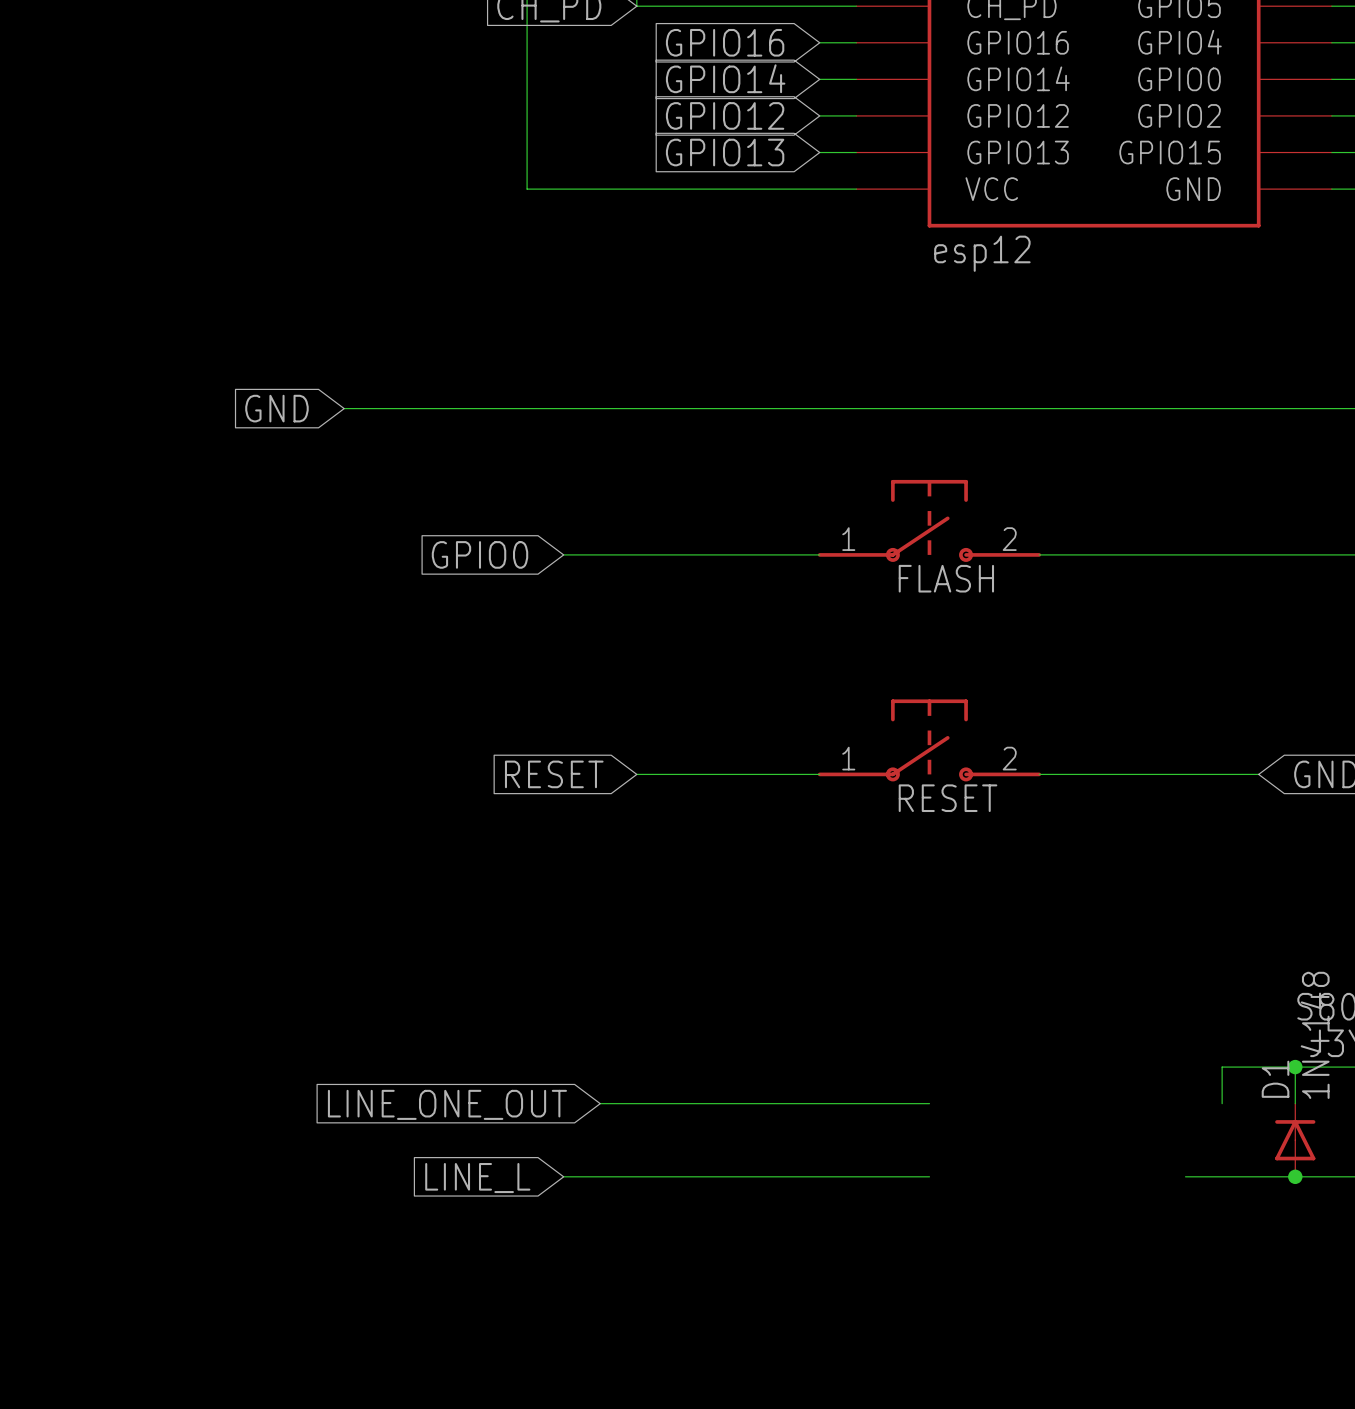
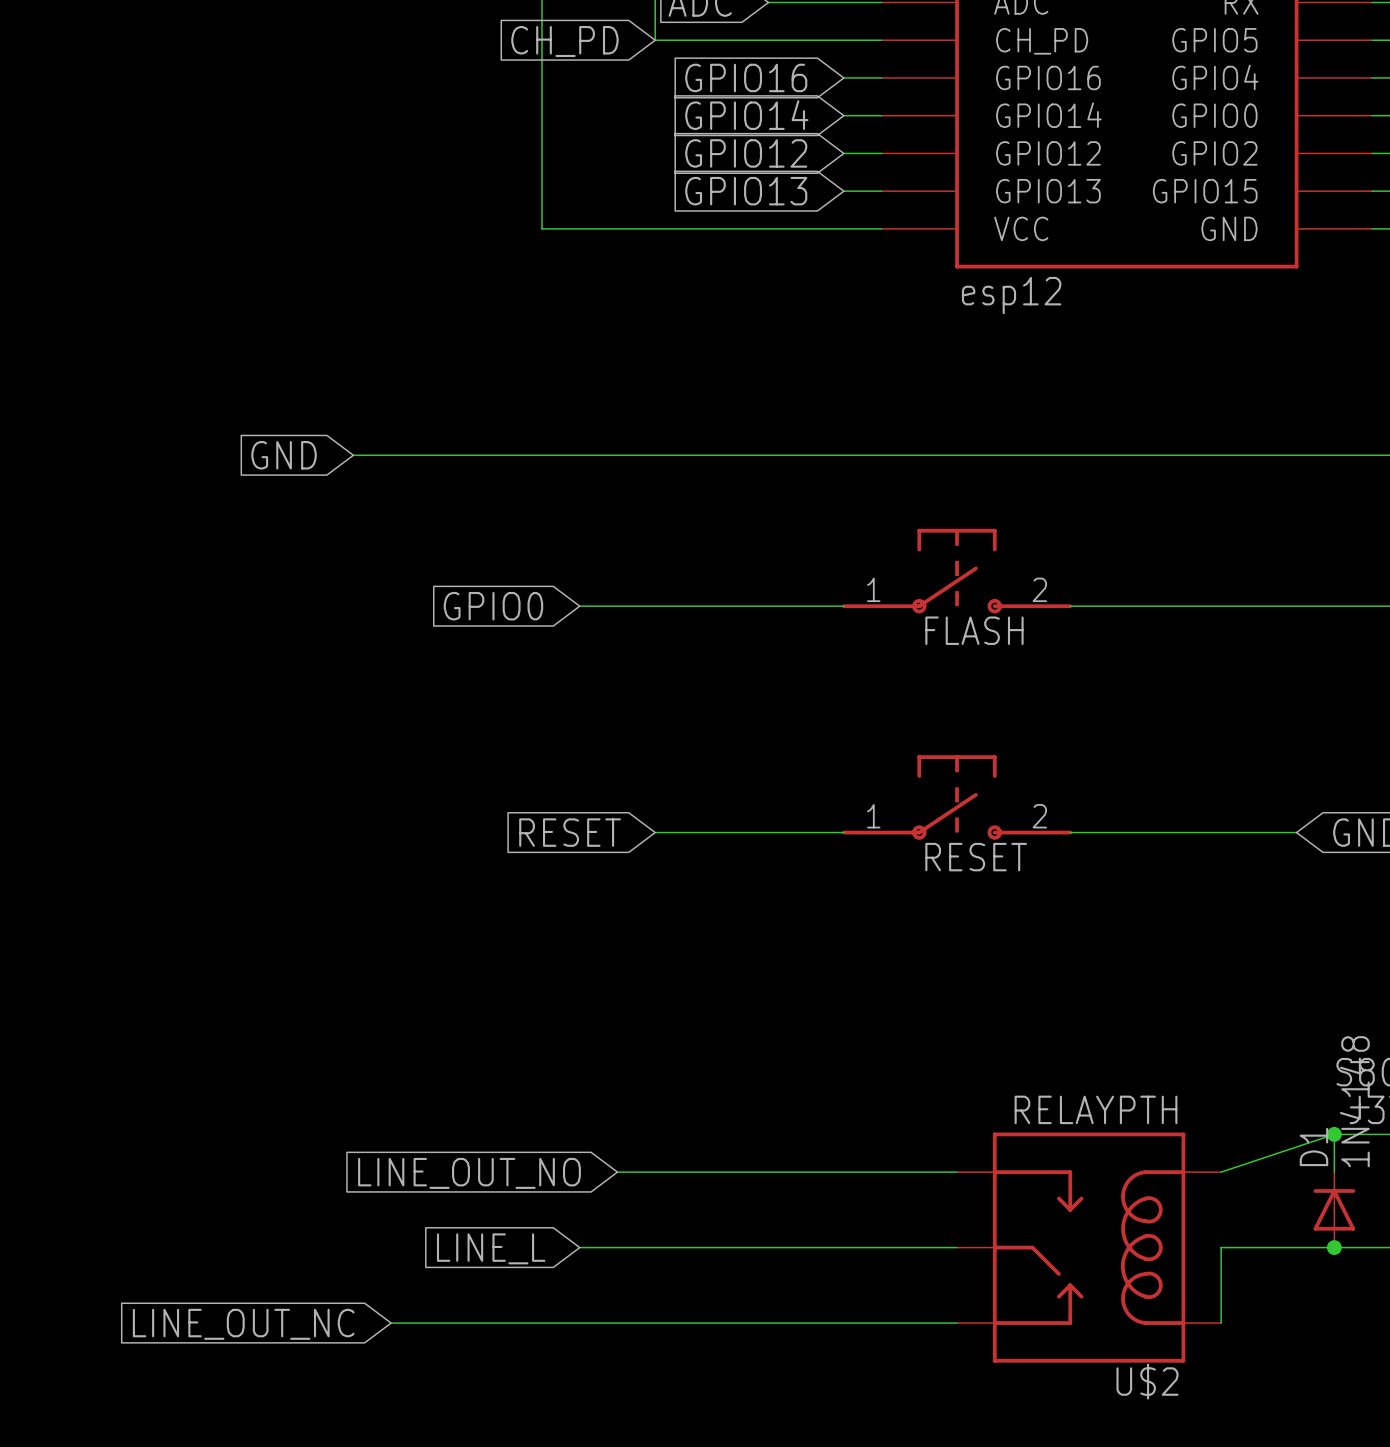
wire: (1295, 1067) (1222, 1067) (1222, 1103) -> (1334, 1134) (1221, 1172)
global label: LINE_ONE_OUT (447, 1104) -> LINE_OUT_NO (469, 1173)
U$2: none -> RELAYPTH (1089, 1247)
wire: none -> (1221, 1247) (1221, 1323)
wire: none -> (391, 1323) (957, 1323)
global label: none -> LINE_OUT_NC (243, 1324)

